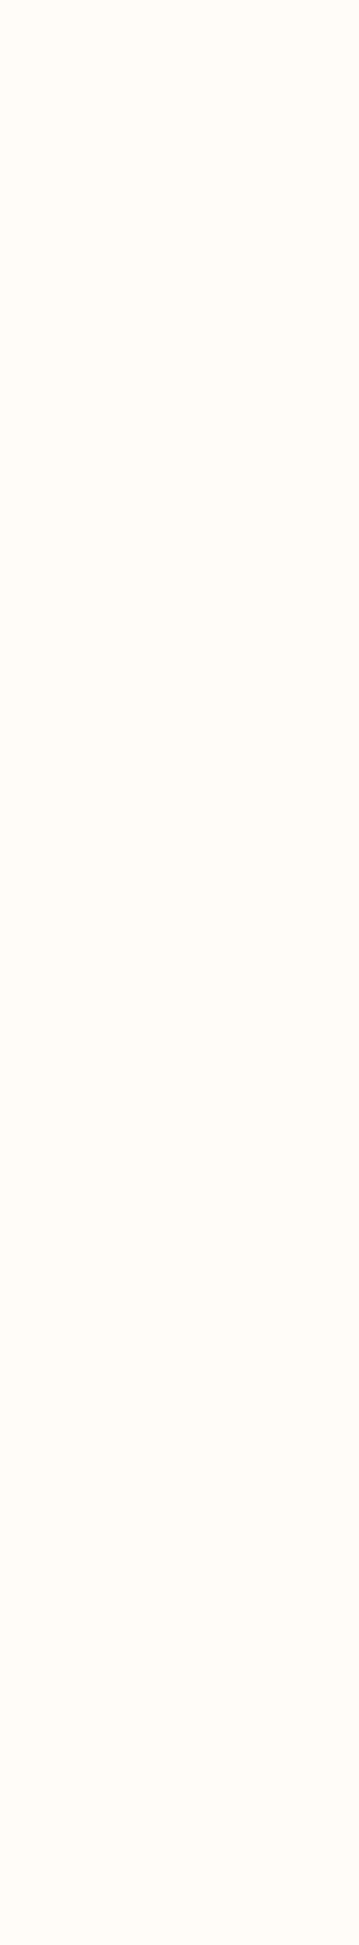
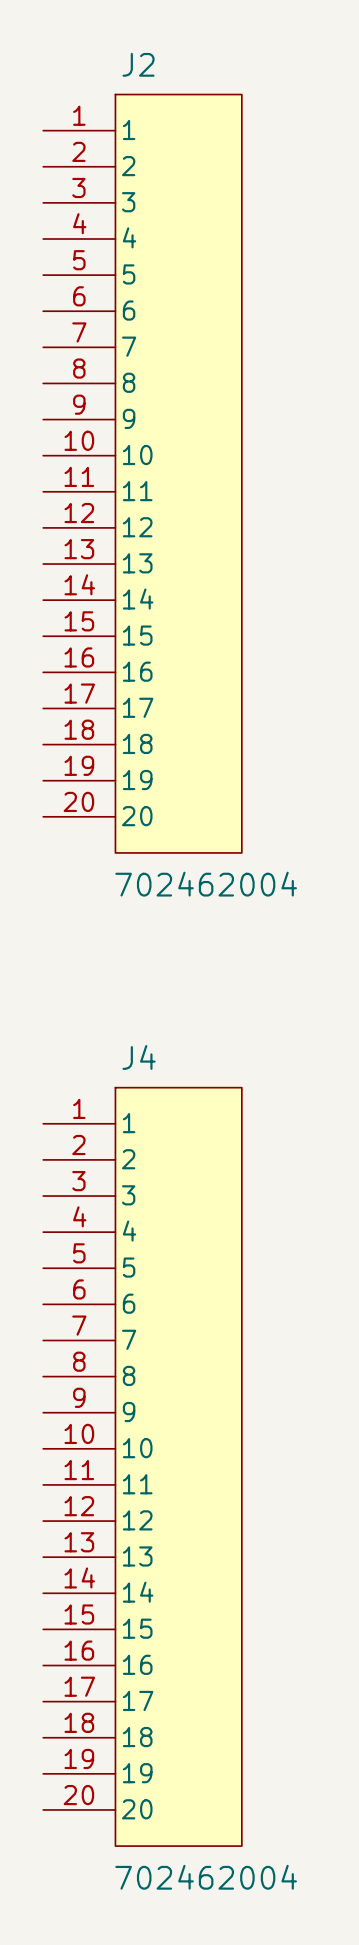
J2: none -> 702462004 (142, 473)
J4: none -> 702462004 (142, 1466)

